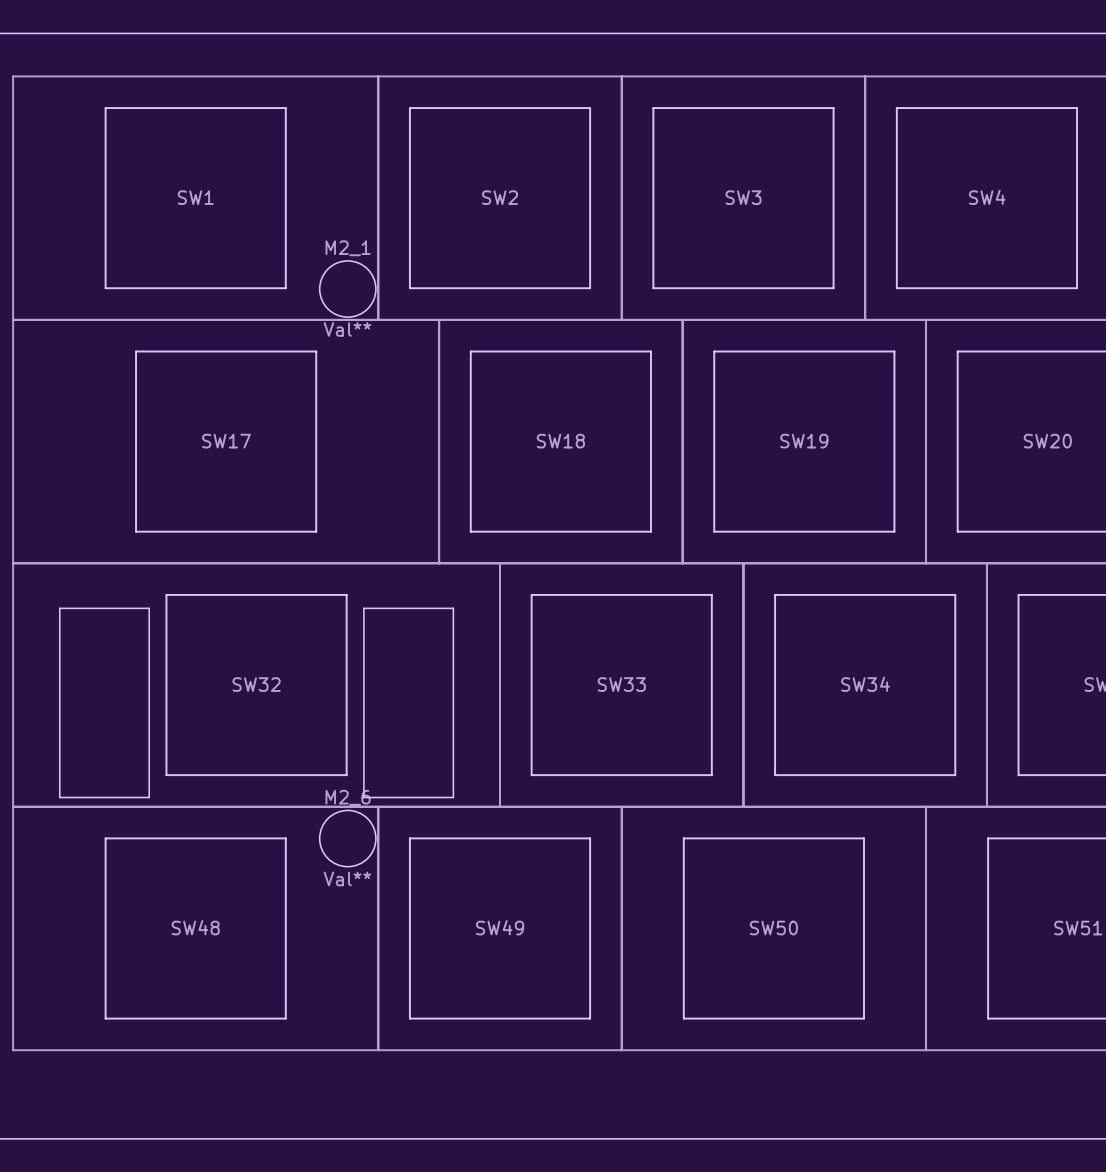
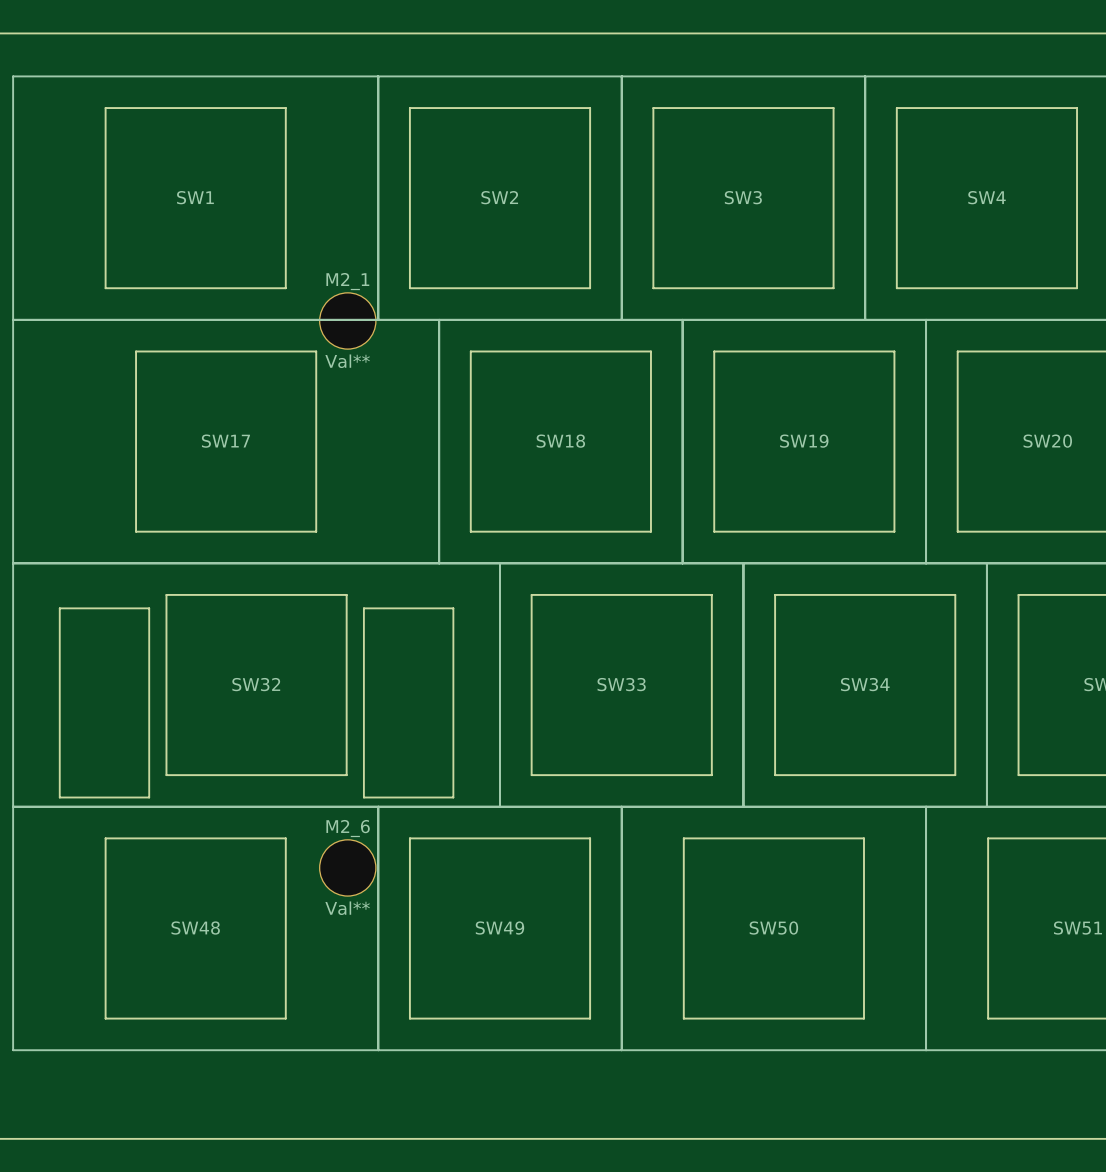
M2_1 footprint: [319, 260, 376, 318] -> [319, 292, 377, 350]
M2_6 footprint: [319, 810, 376, 867] -> [319, 839, 377, 897]

